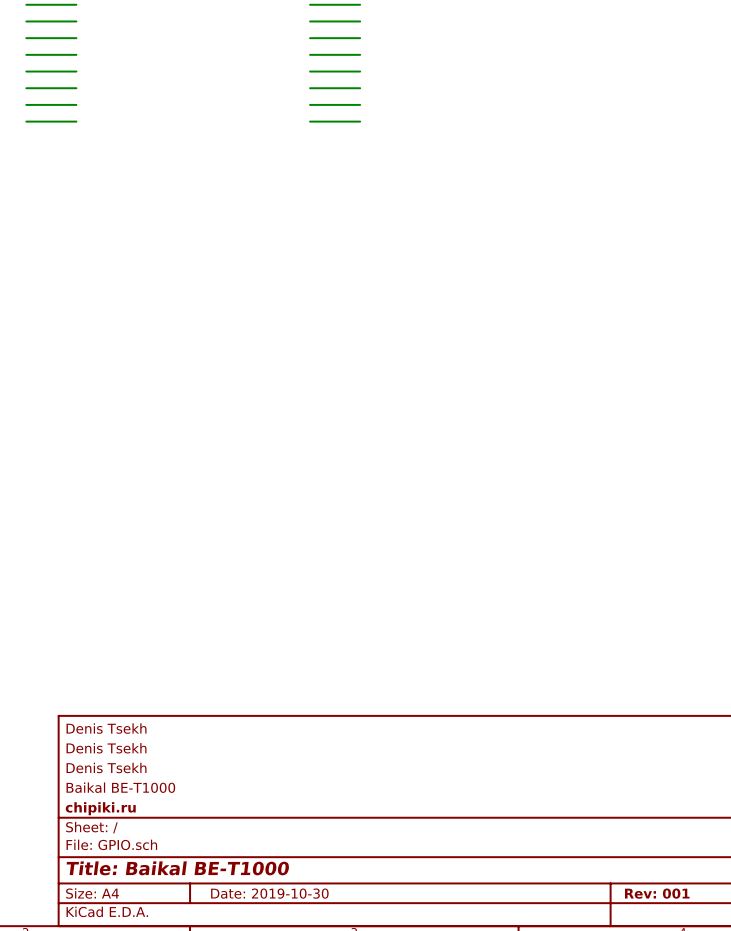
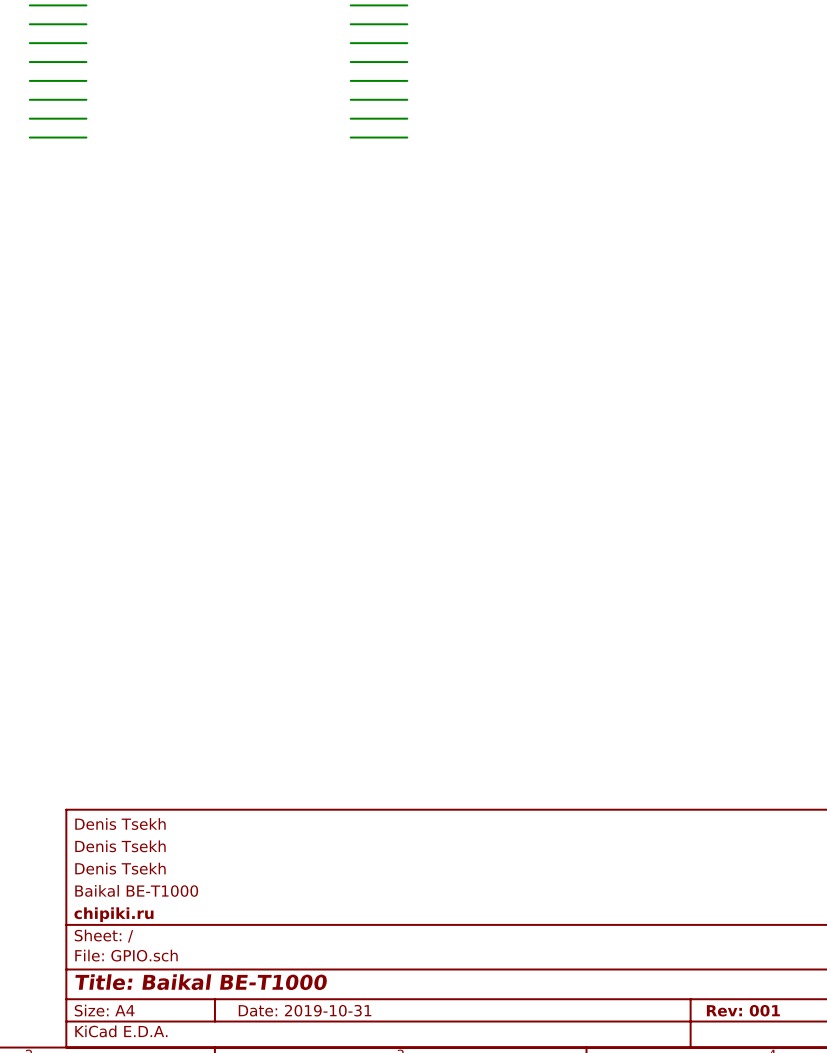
title block: Date: 2019-10-30 (269, 893) -> Date: 2019-10-31 (305, 1010)

